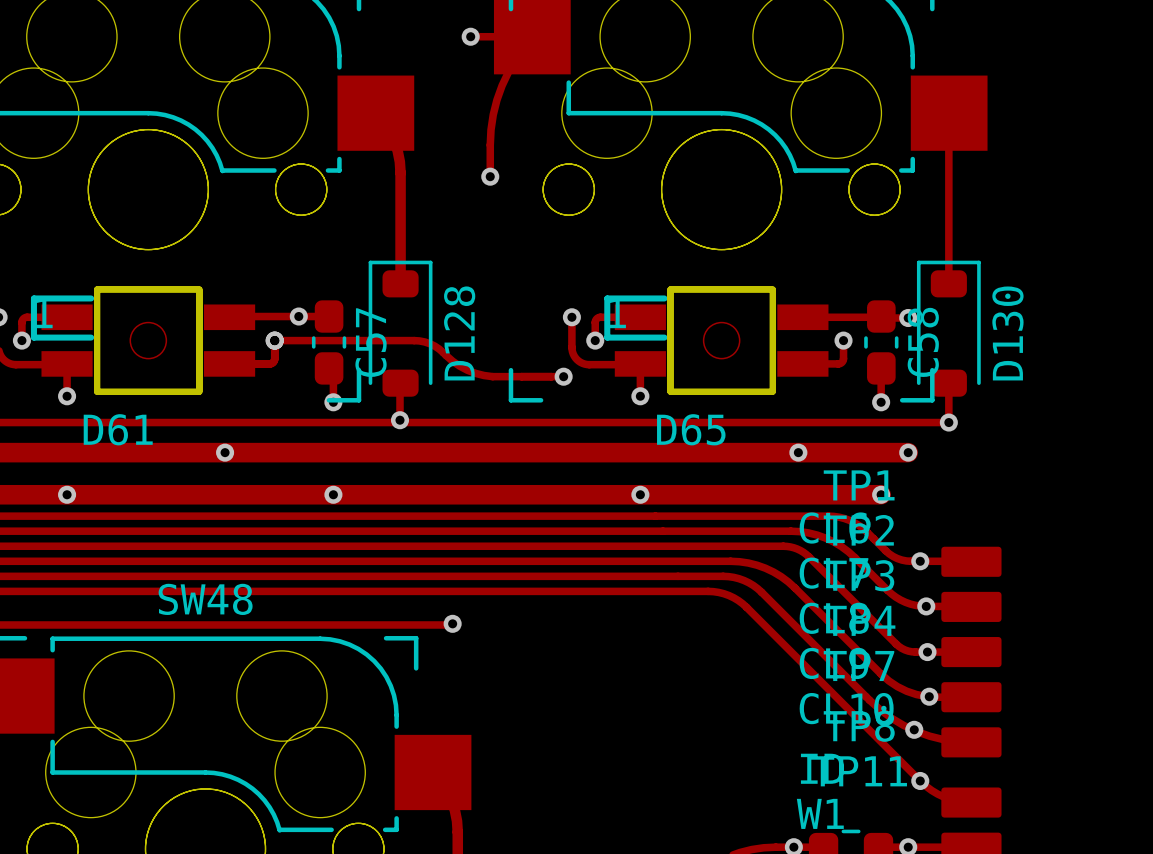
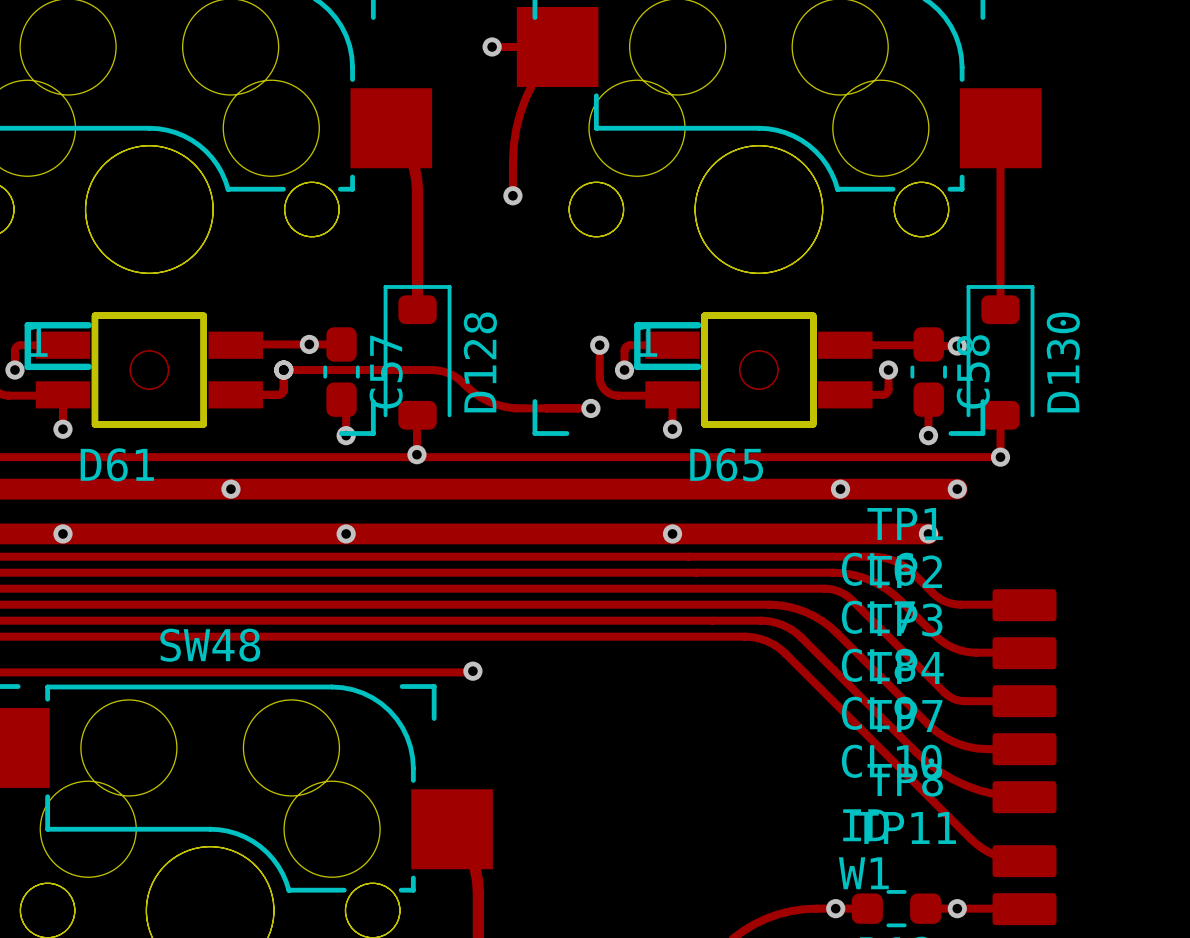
via: (920, 561) -> none
via: (926, 606) -> none
via: (927, 652) -> none
via: (929, 696) -> none
via: (914, 729) -> none
via: (920, 780) -> none

